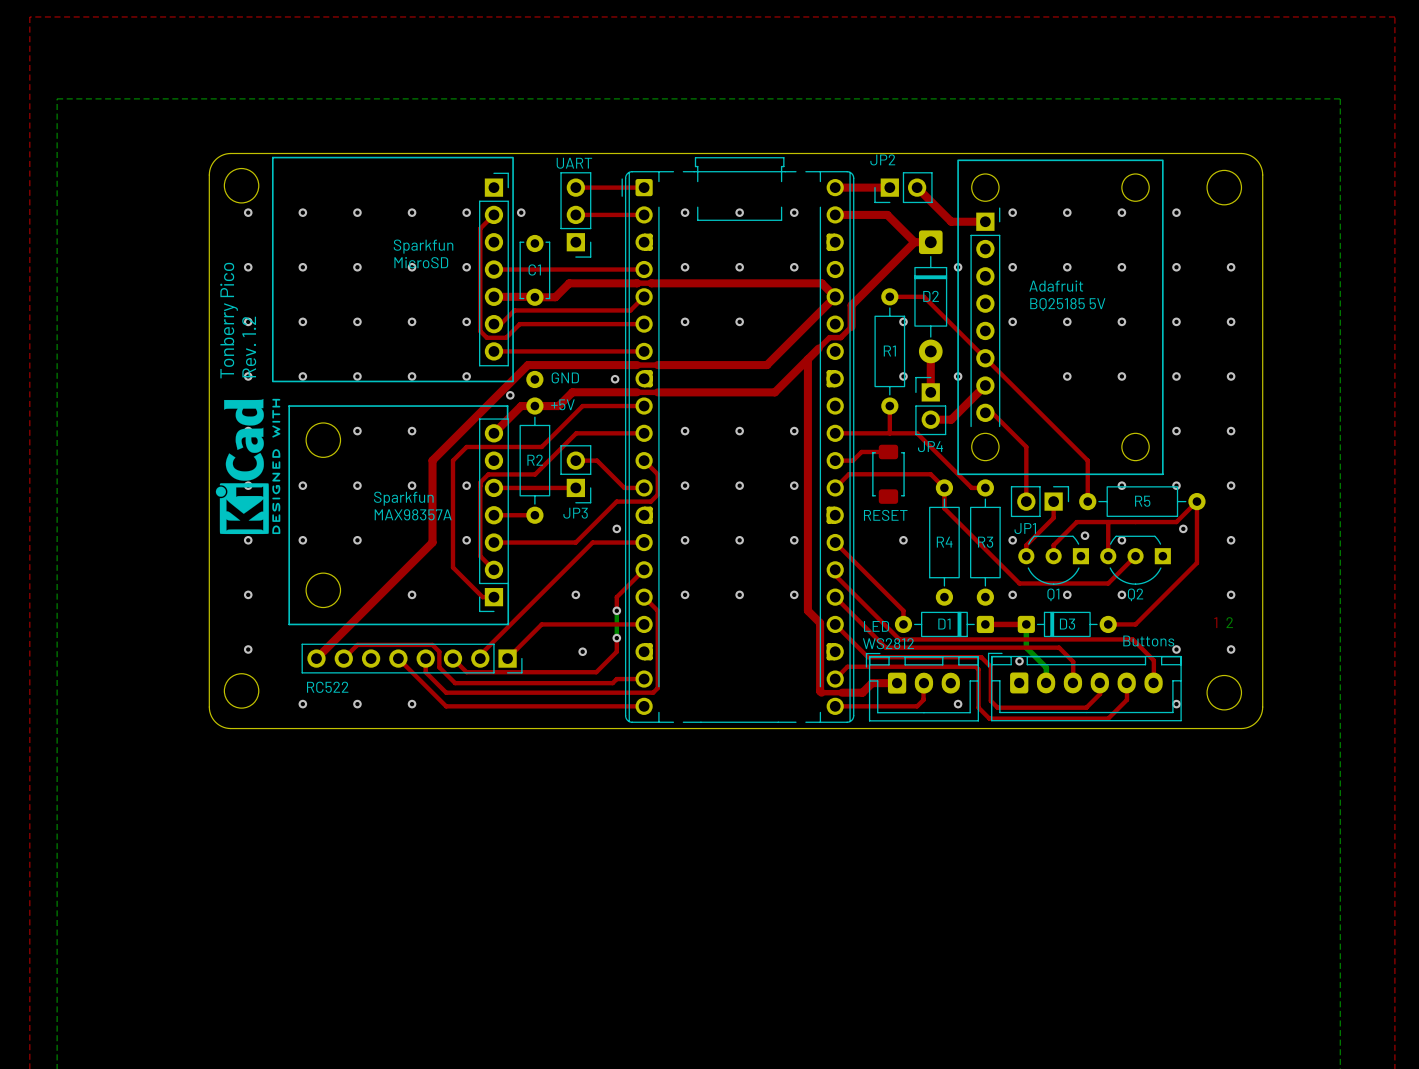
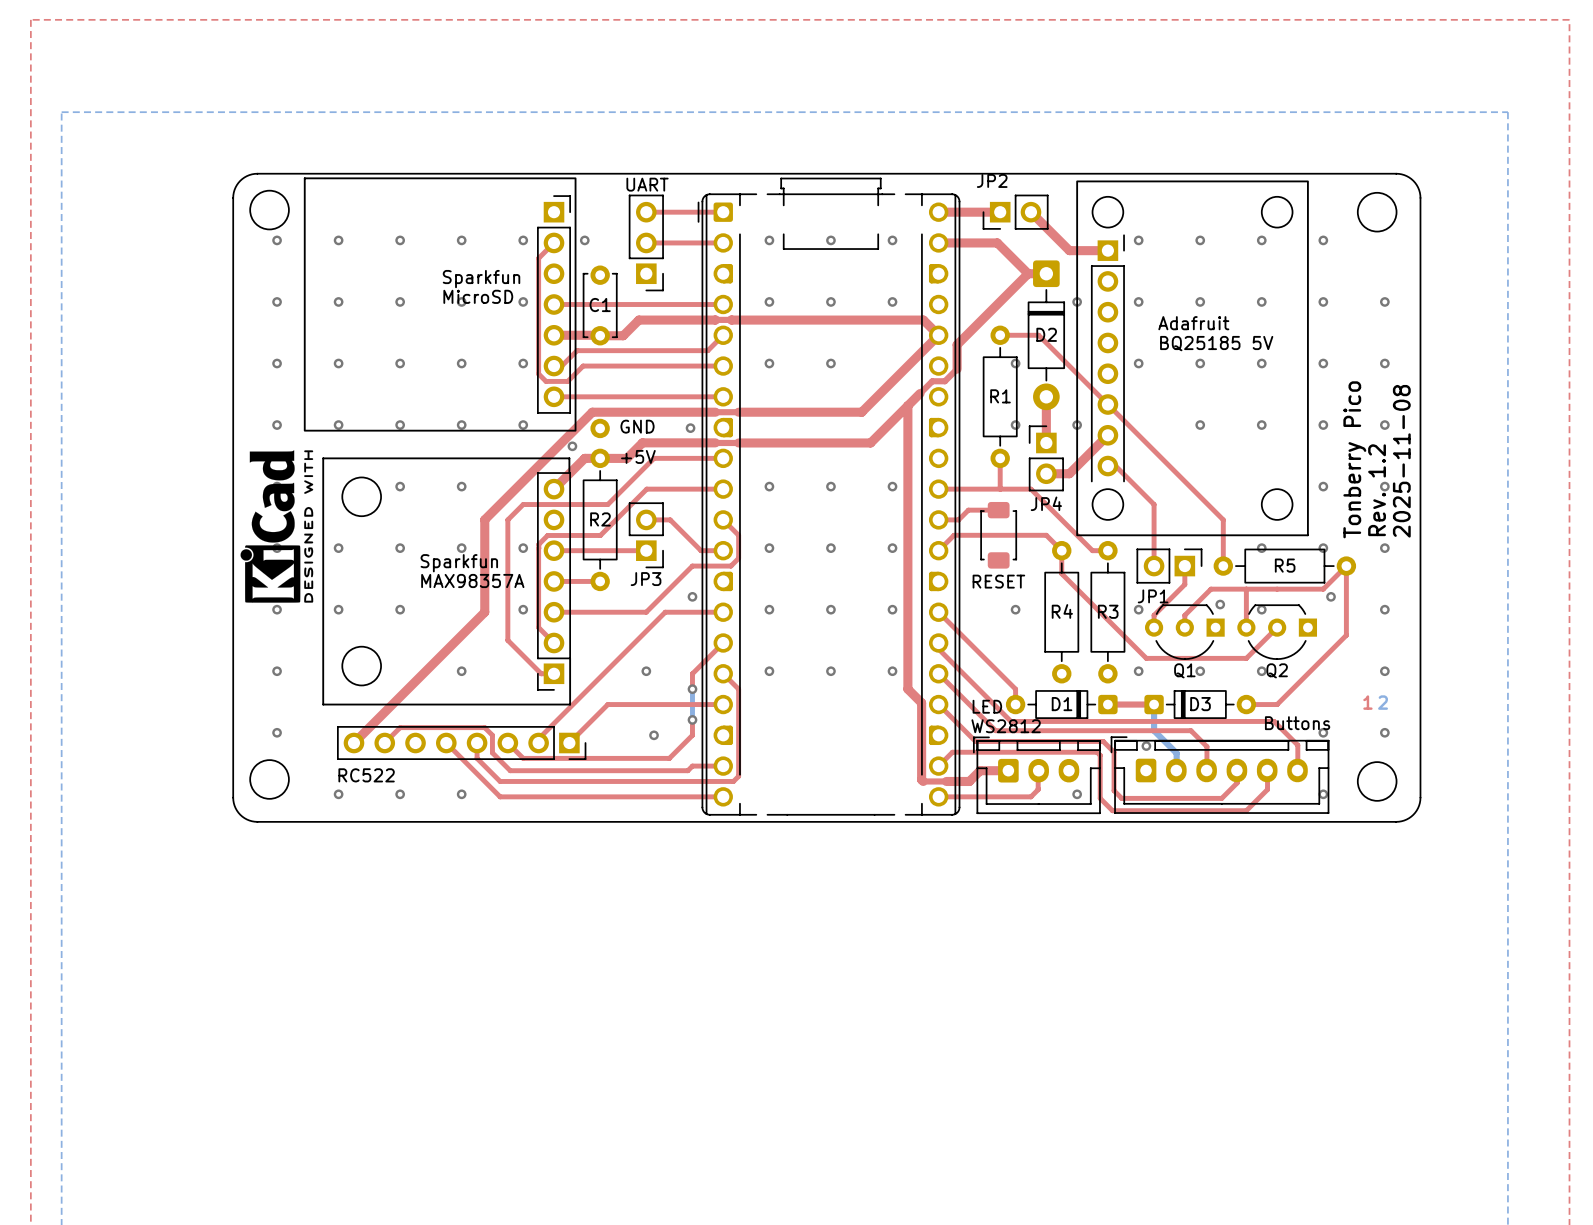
text: Tonberry Pico (229, 320) -> none
text: Rev. 1.2 (249, 347) -> none
text: none -> Tonberry Pico (1354, 459)
text: none -> 2025-11-08 (1401, 461)
text: none -> Rev. 1.2 (1377, 490)

